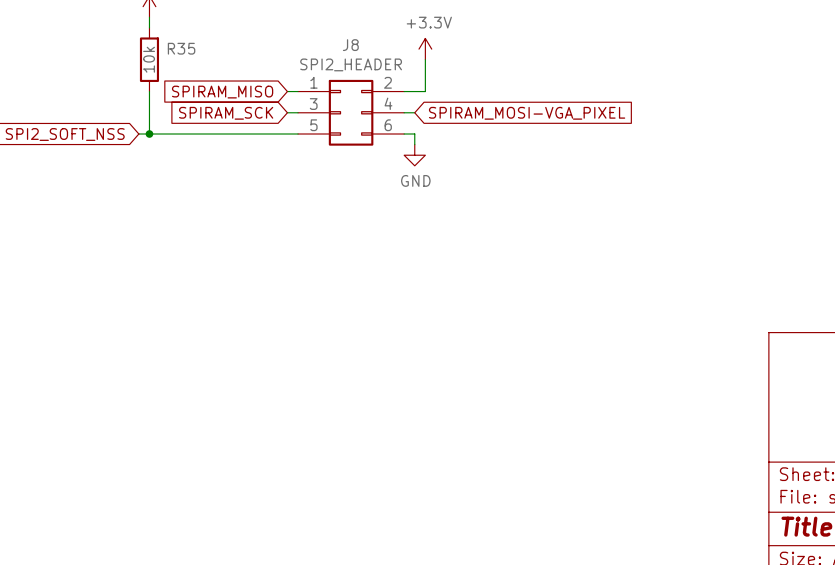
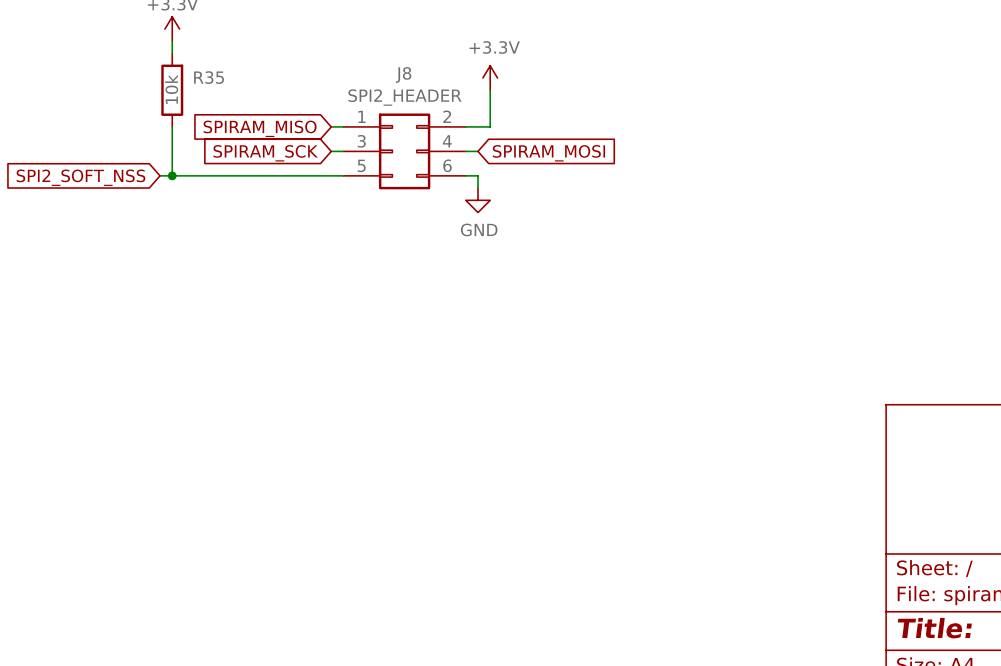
global label: SPIRAM_MOSI-VGA_PIXEL (527, 113) -> SPIRAM_MOSI (548, 153)

